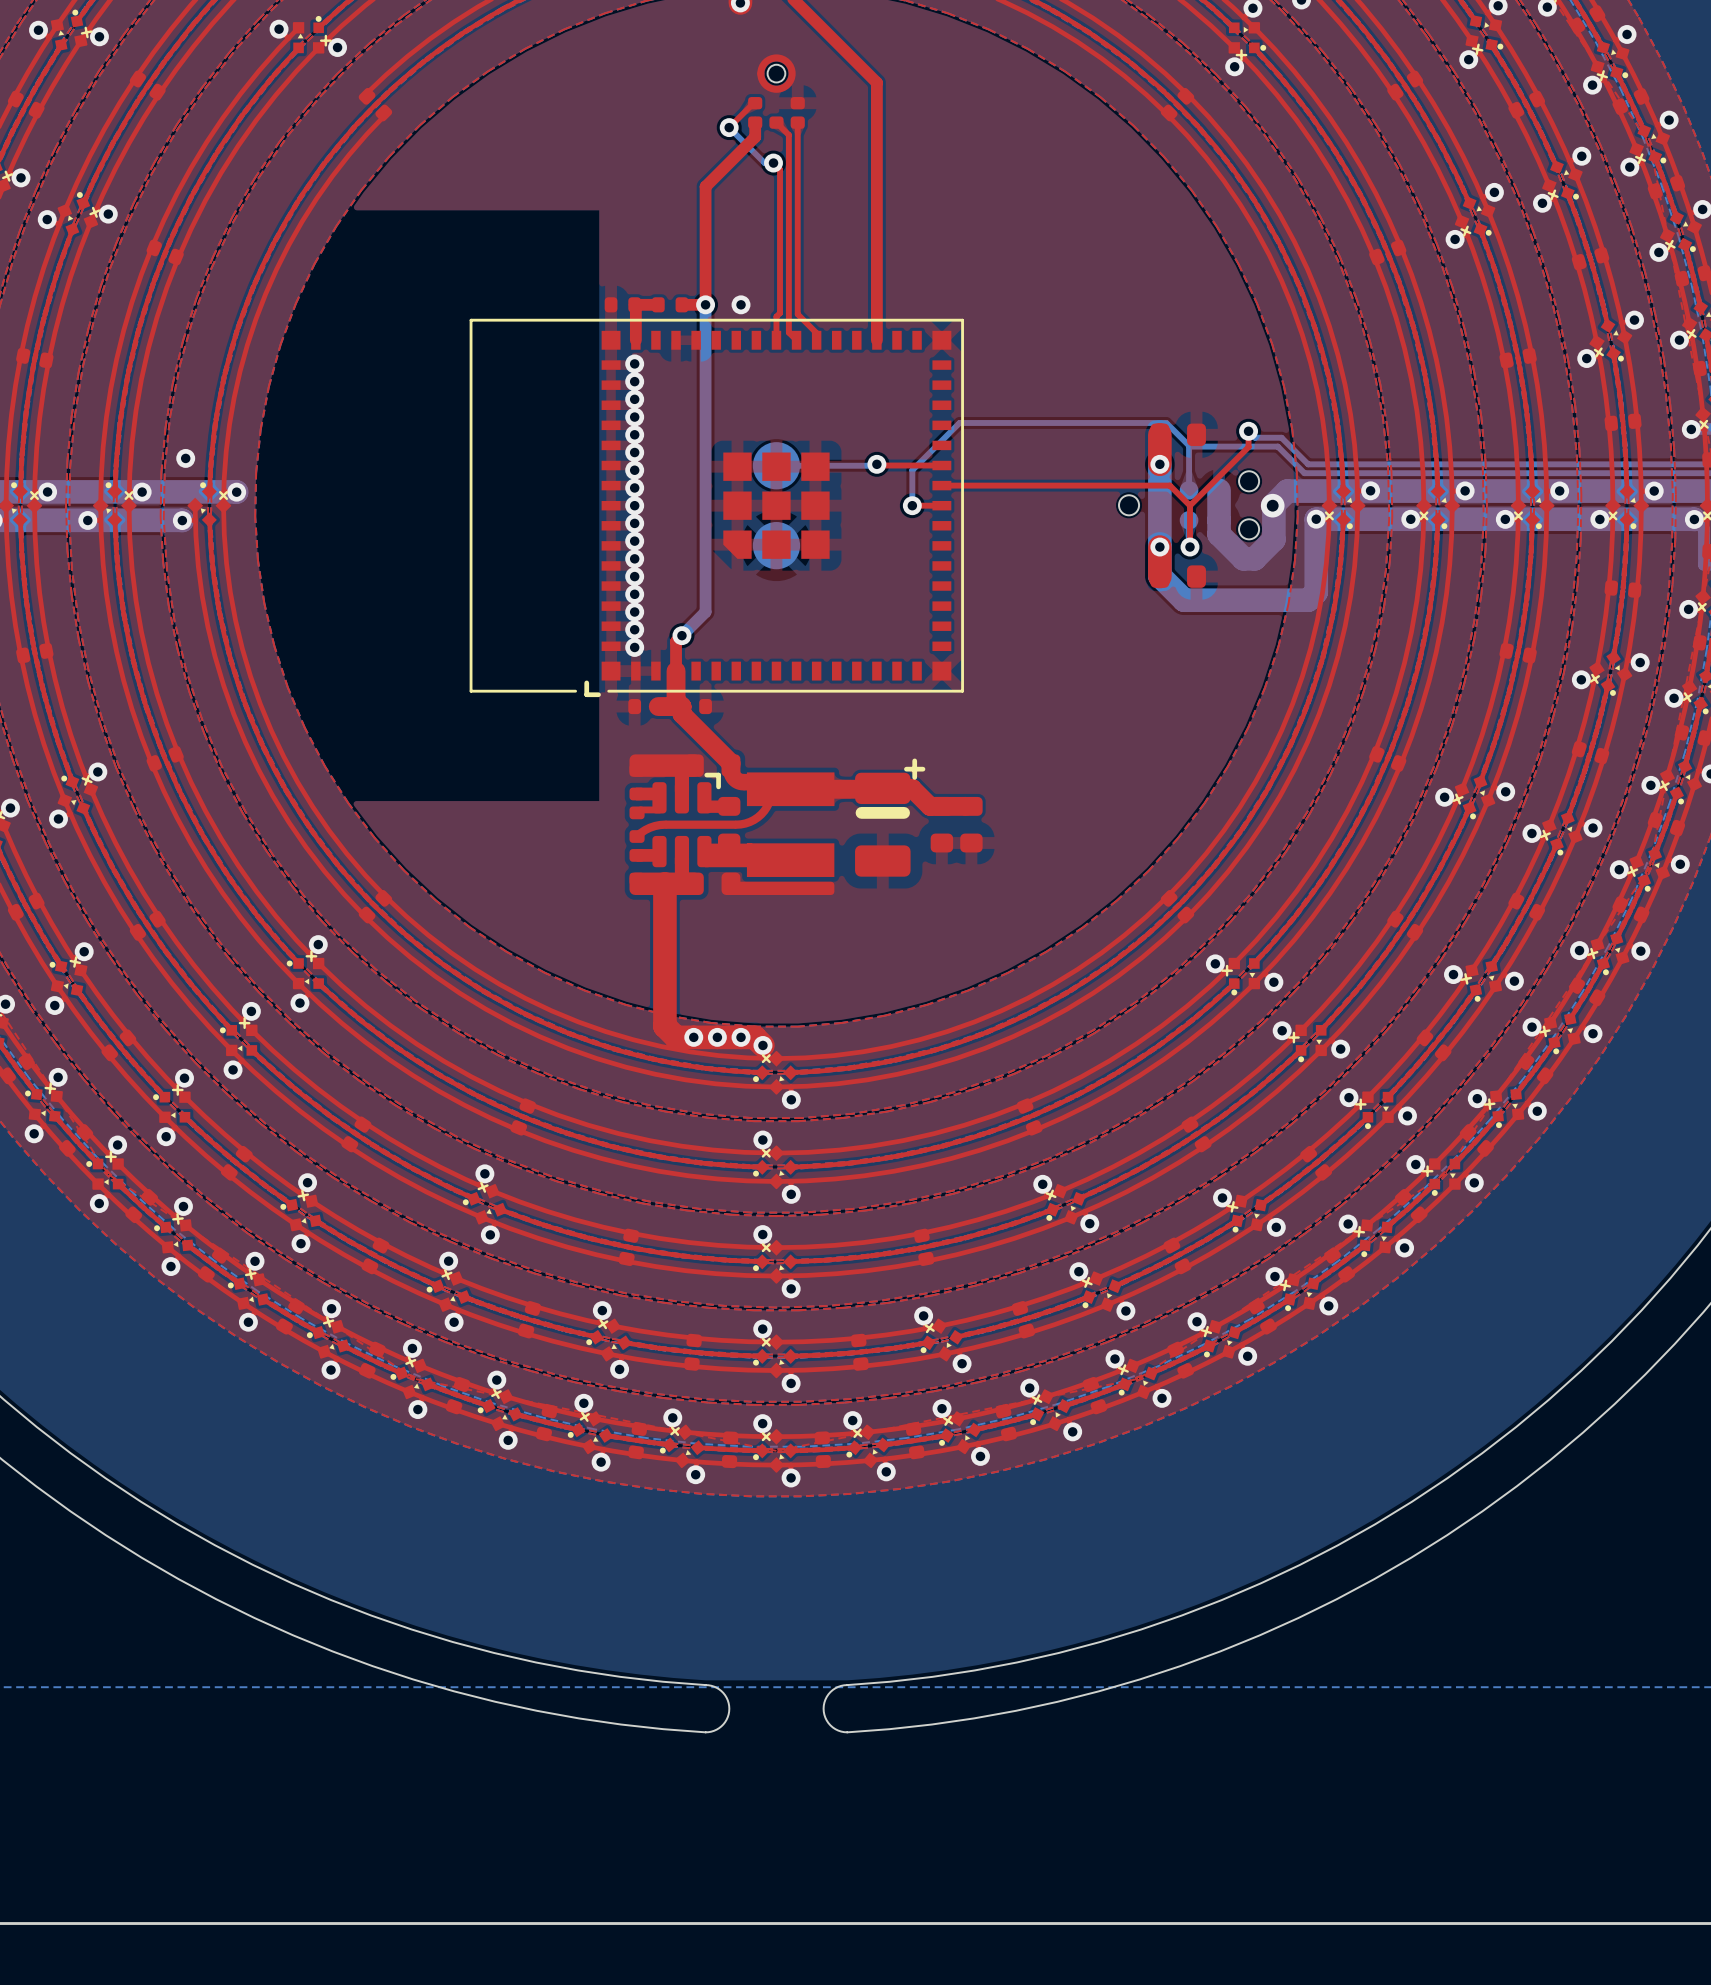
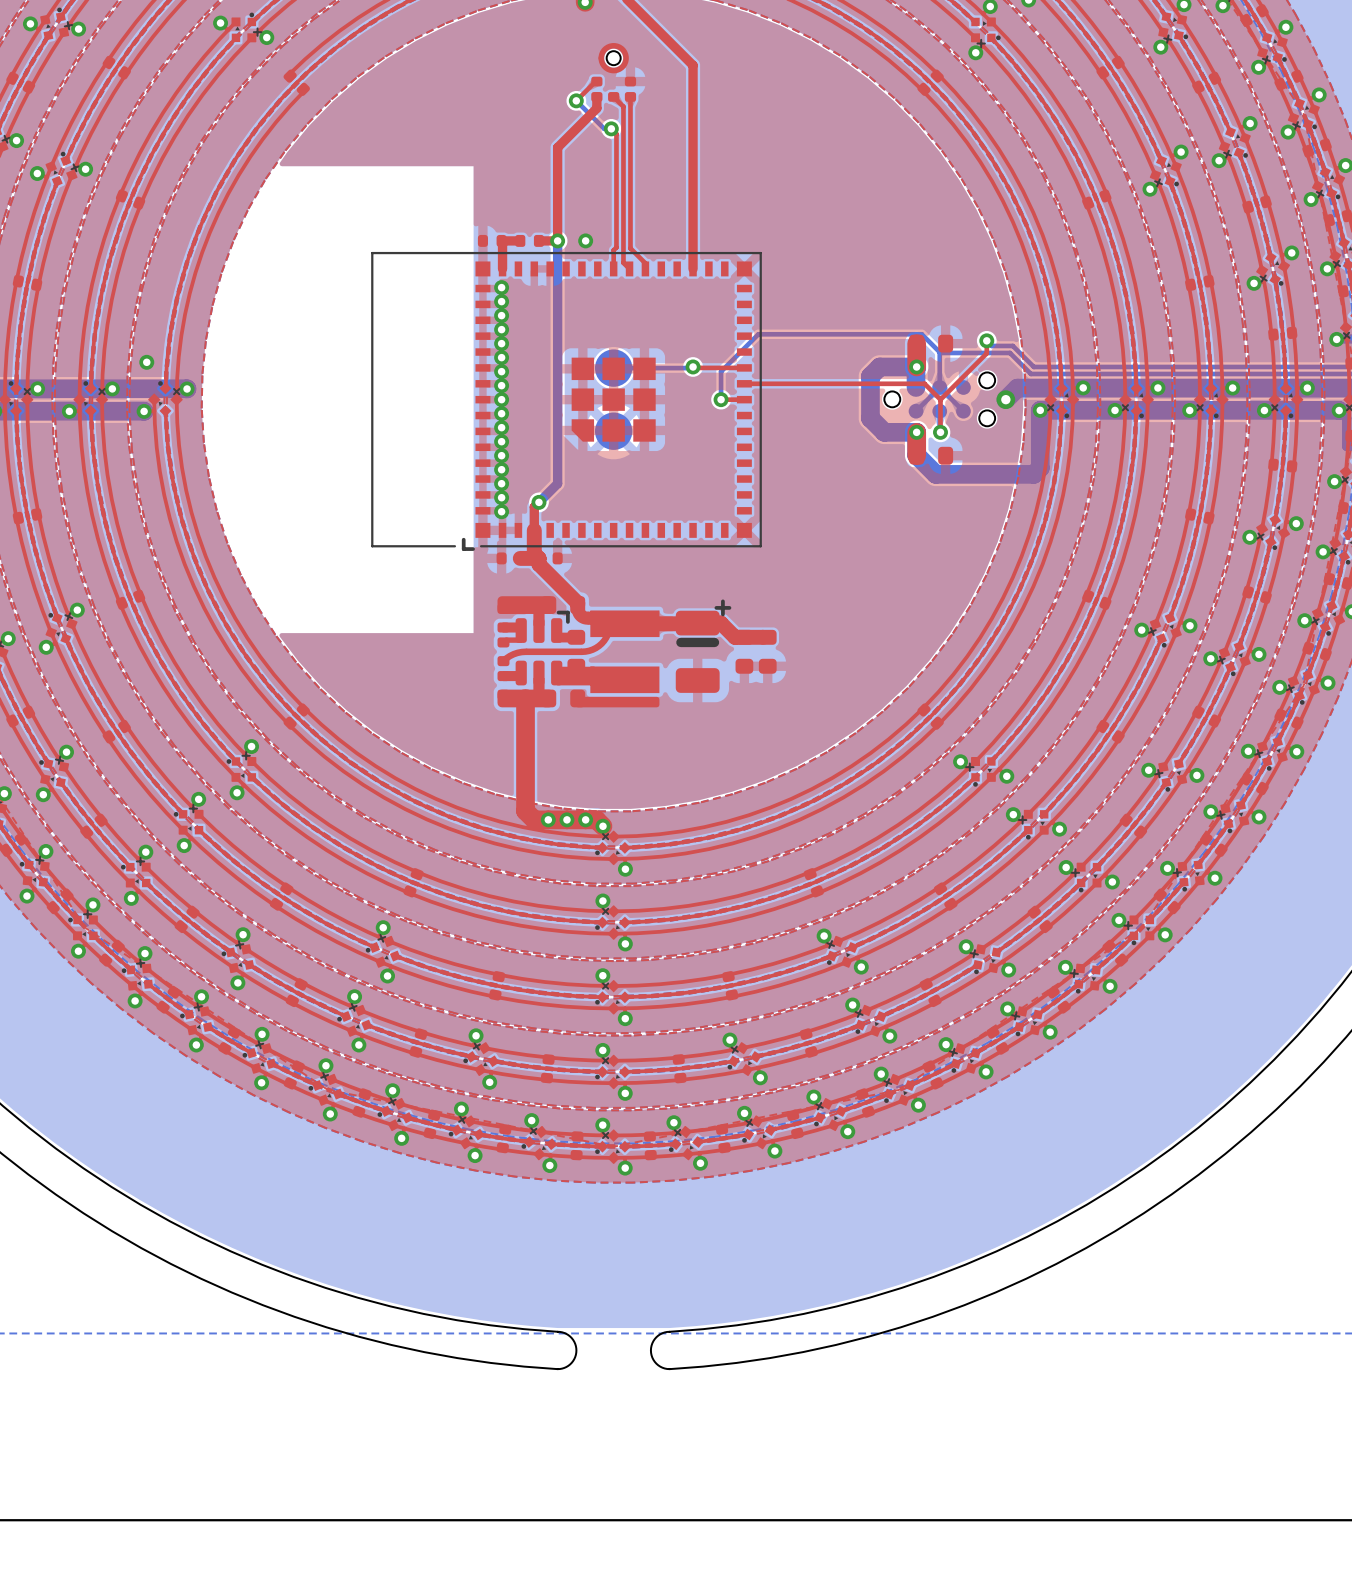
bottom track: (1159, 464) (1159, 547) -> (916, 387) (916, 366) (879, 366) (870, 376) (870, 418) (884, 432) (916, 432)
bottom track: (1219, 490) (1219, 534) (1243, 558) (1254, 558) (1273, 539) (1272, 505) -> none
bottom track: none -> (916, 411) (939, 387) (963, 411)

